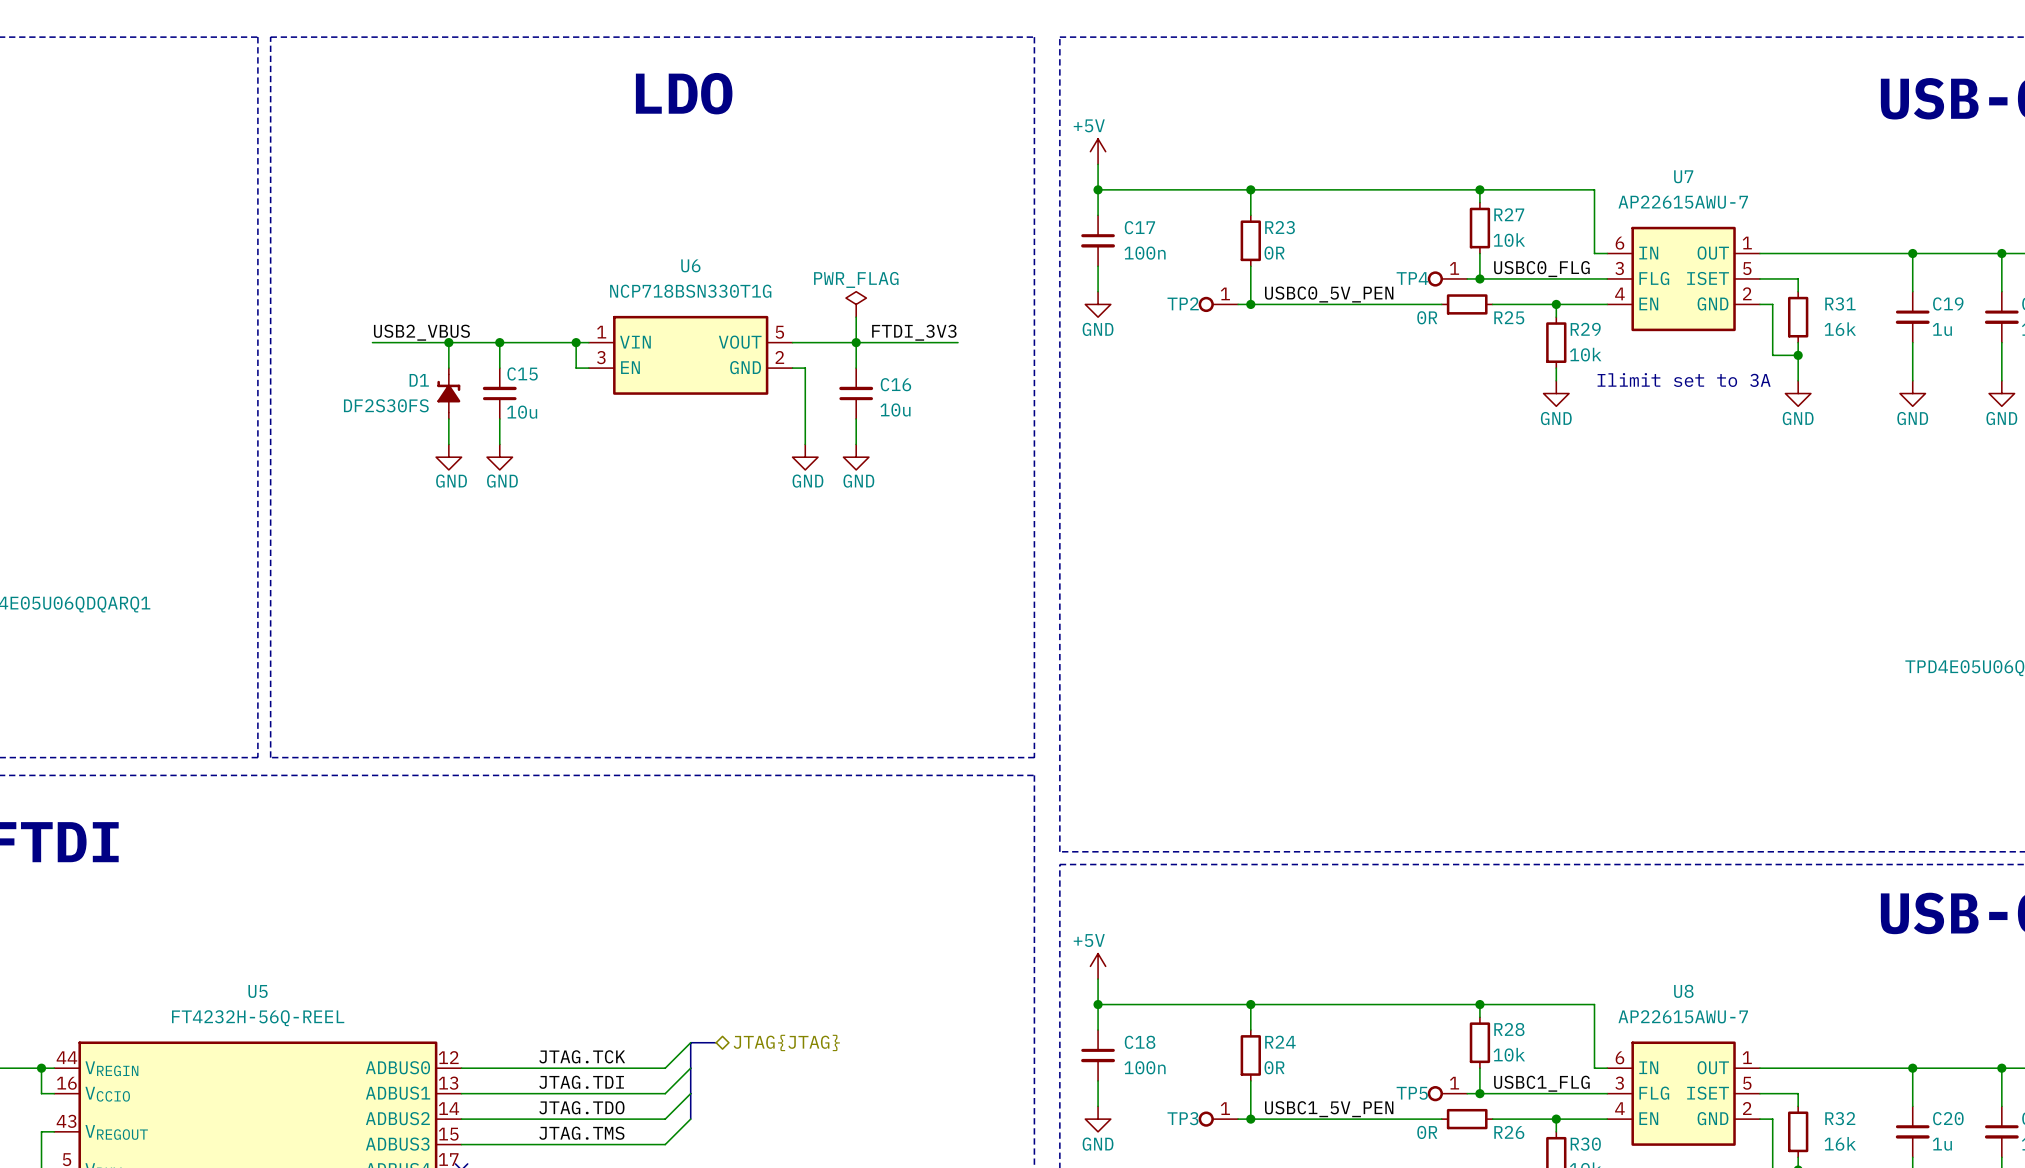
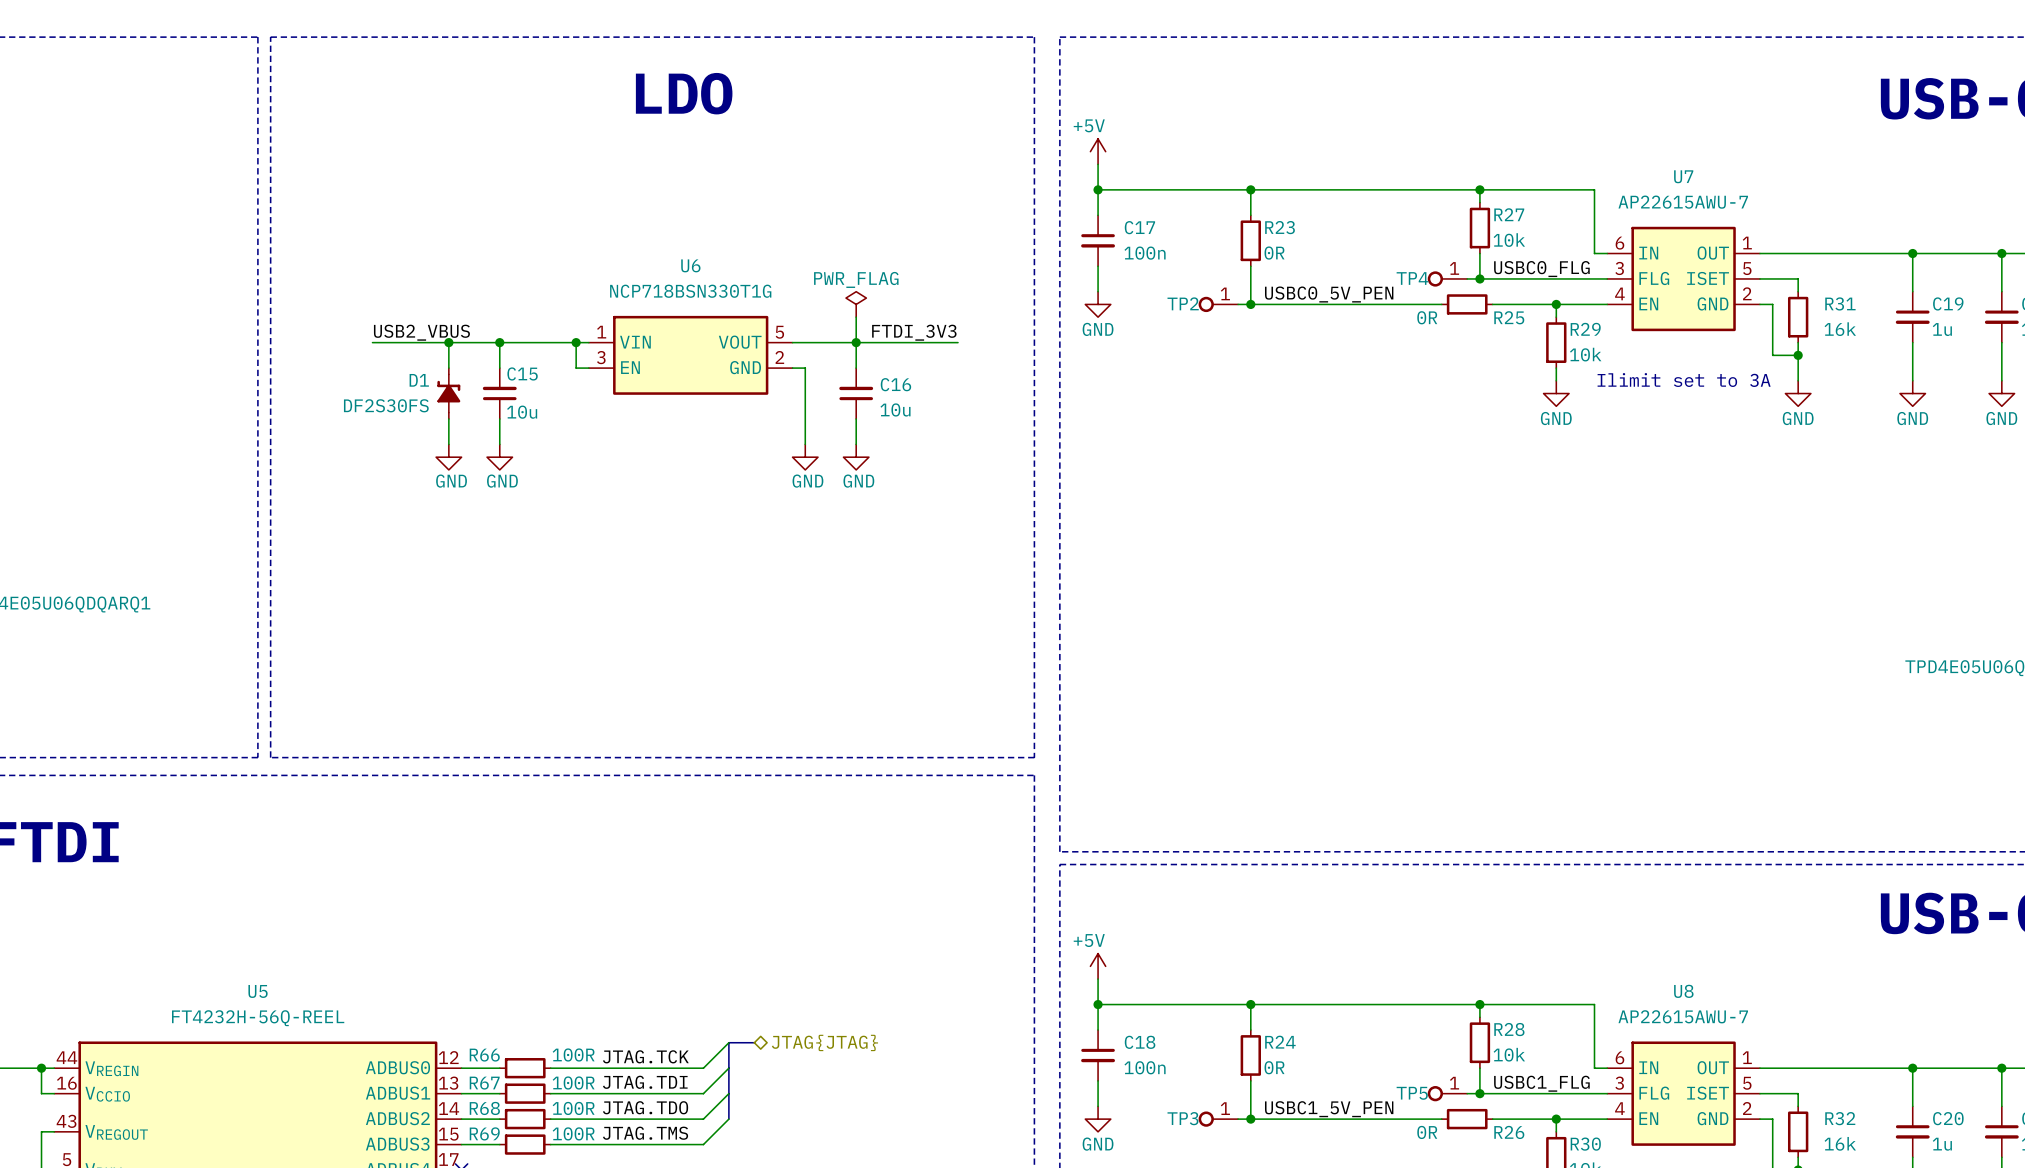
wire: (690, 1042) (665, 1068) -> (728, 1042) (703, 1068) (665, 1068)
bus: (716, 1042) (690, 1042) (690, 1119) -> (754, 1042) (728, 1042) (728, 1119)
hierarchical label position: JTAG{JTAG} (786, 1042) -> JTAG{JTAG} (824, 1042)
label position: JTAG.TCK (582, 1056) -> JTAG.TCK (645, 1056)
wire: (499, 1068) (550, 1068) -> none
R66: none -> (525, 1068)
wire: (690, 1068) (665, 1093) -> (728, 1068) (703, 1093) (665, 1093)
label position: JTAG.TDI (581, 1082) -> JTAG.TDI (645, 1082)
wire: (499, 1093) (550, 1093) -> none
R67: none -> (525, 1093)
wire: (690, 1093) (665, 1119) -> (728, 1093) (703, 1119) (665, 1119)
label position: JTAG.TDO (581, 1107) -> JTAG.TDO (645, 1107)
wire: (499, 1119) (550, 1119) -> none
R68: none -> (525, 1119)
wire: (690, 1119) (665, 1144) -> (728, 1119) (703, 1144) (665, 1144)
label position: JTAG.TMS (581, 1133) -> JTAG.TMS (645, 1133)
wire: (499, 1144) (550, 1144) -> none
R69: none -> (525, 1144)

